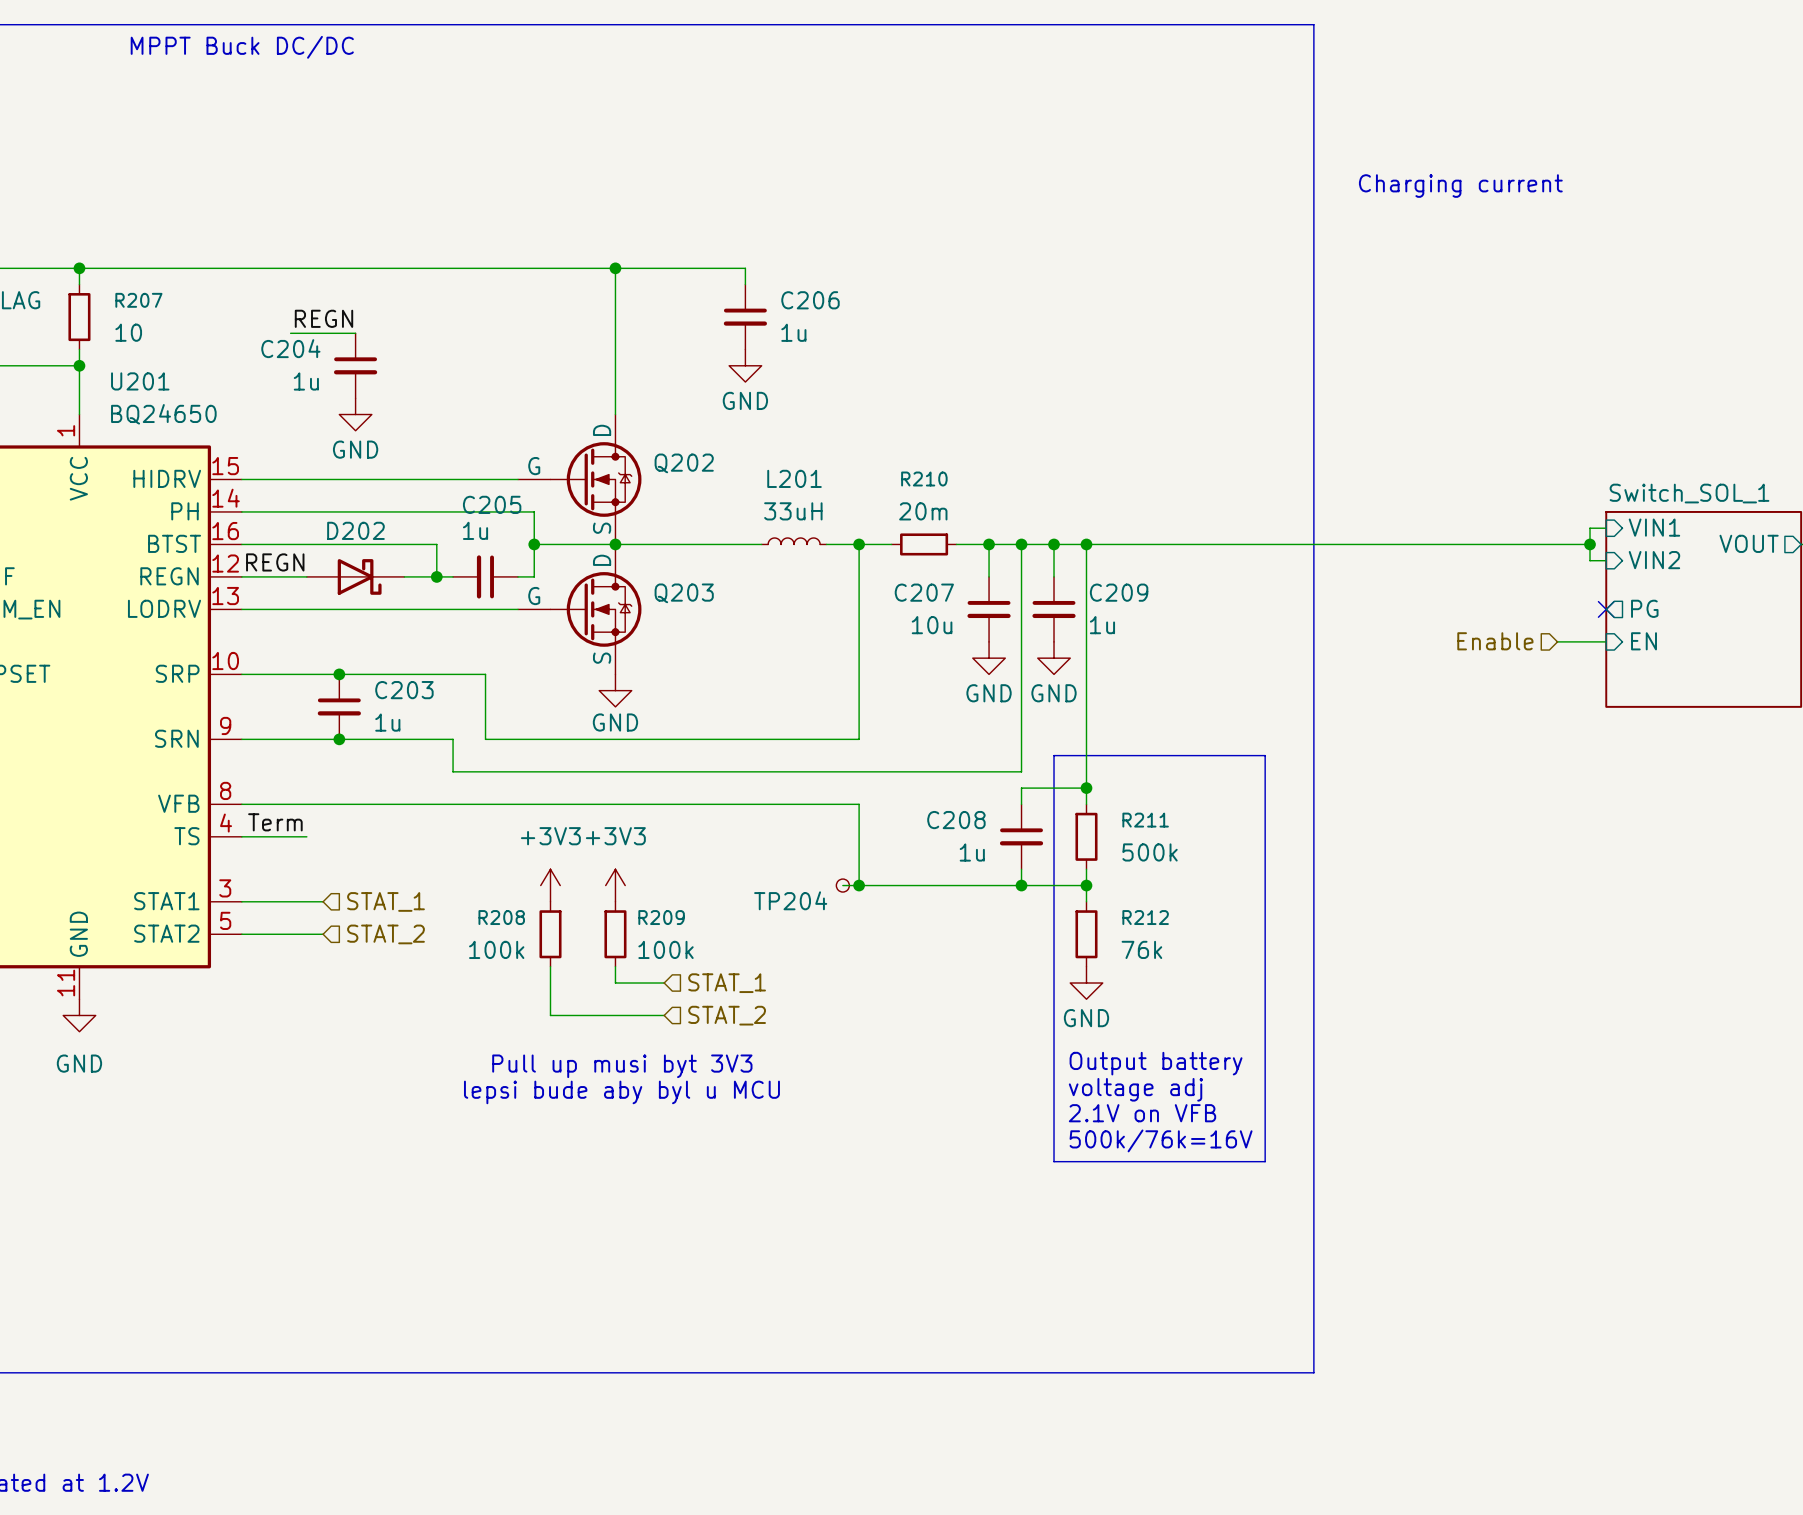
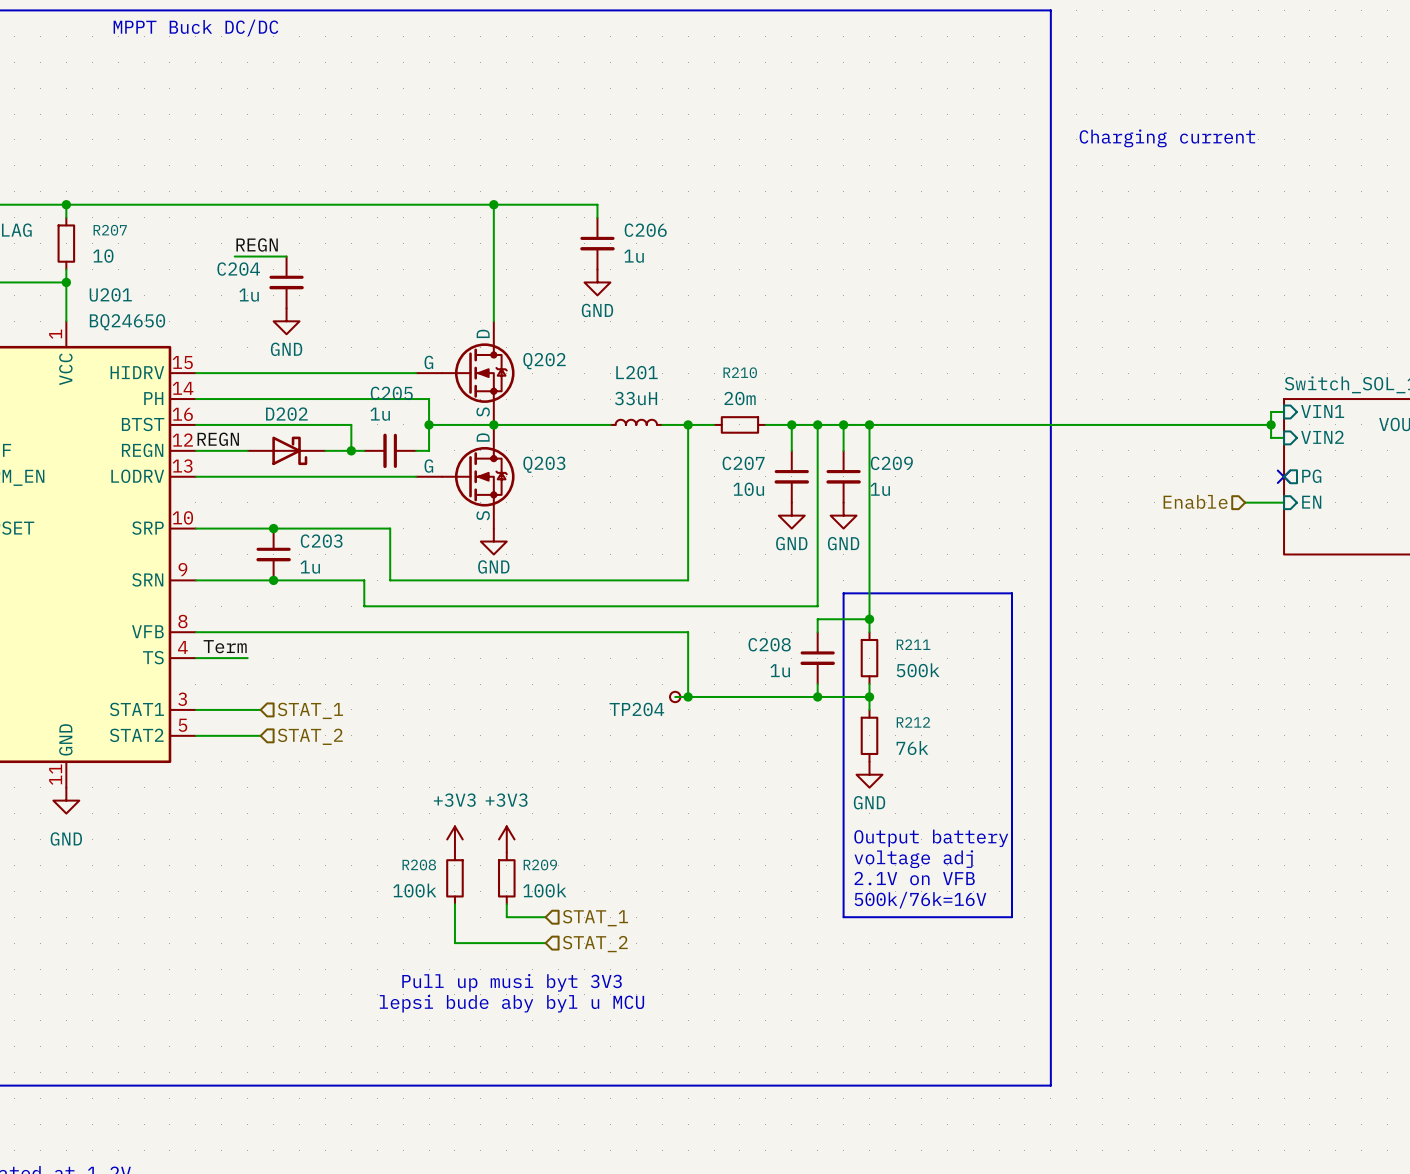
power symbol: +3V3 (550, 885) -> none
power symbol: +3V3 (615, 885) -> none
R208 position: (550, 934) -> (454, 878)
R209 position: (615, 934) -> (506, 878)
wire: (550, 966) (550, 1015) (664, 1015) -> (454, 904) (454, 943) (545, 943)
wire: (615, 966) (615, 983) (664, 983) -> (506, 904) (506, 917) (545, 917)
hierarchical label position: STAT_1 (727, 983) -> STAT_1 (595, 918)
hierarchical label position: STAT_2 (727, 1015) -> STAT_2 (595, 944)
power symbol: none -> +3V3 (454, 839)
power symbol: none -> +3V3 (506, 839)
text position: Pull up musi byt 3V3 (622, 1066) -> Pull up musi byt 3V3 (512, 982)
text position: lepsi bude aby byl u MCU (621, 1092) -> lepsi bude aby byl u MCU (511, 1003)

